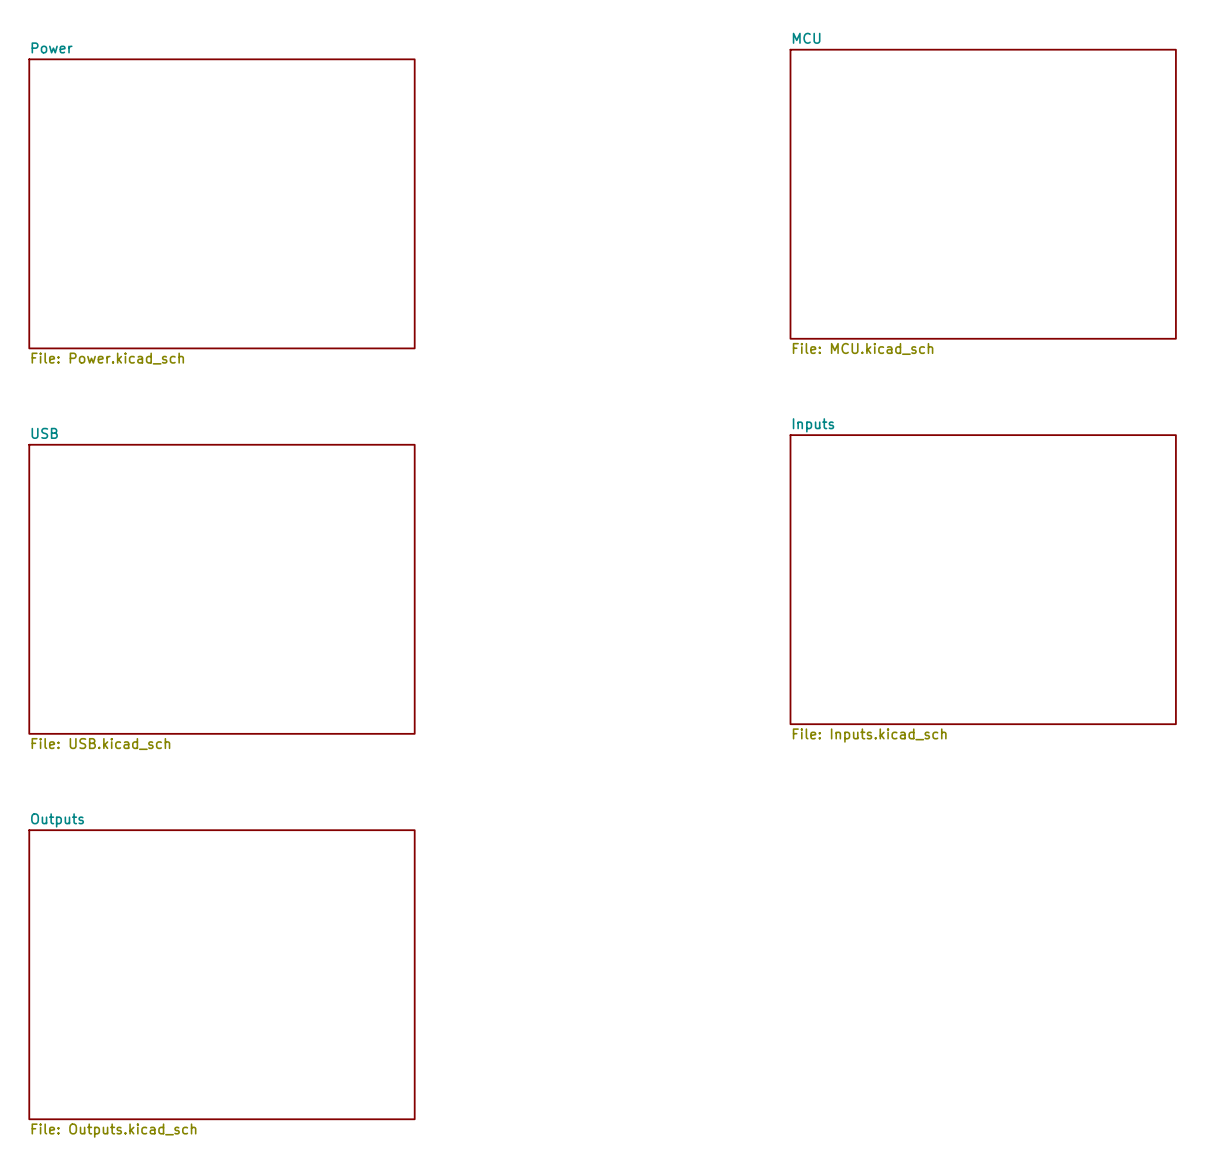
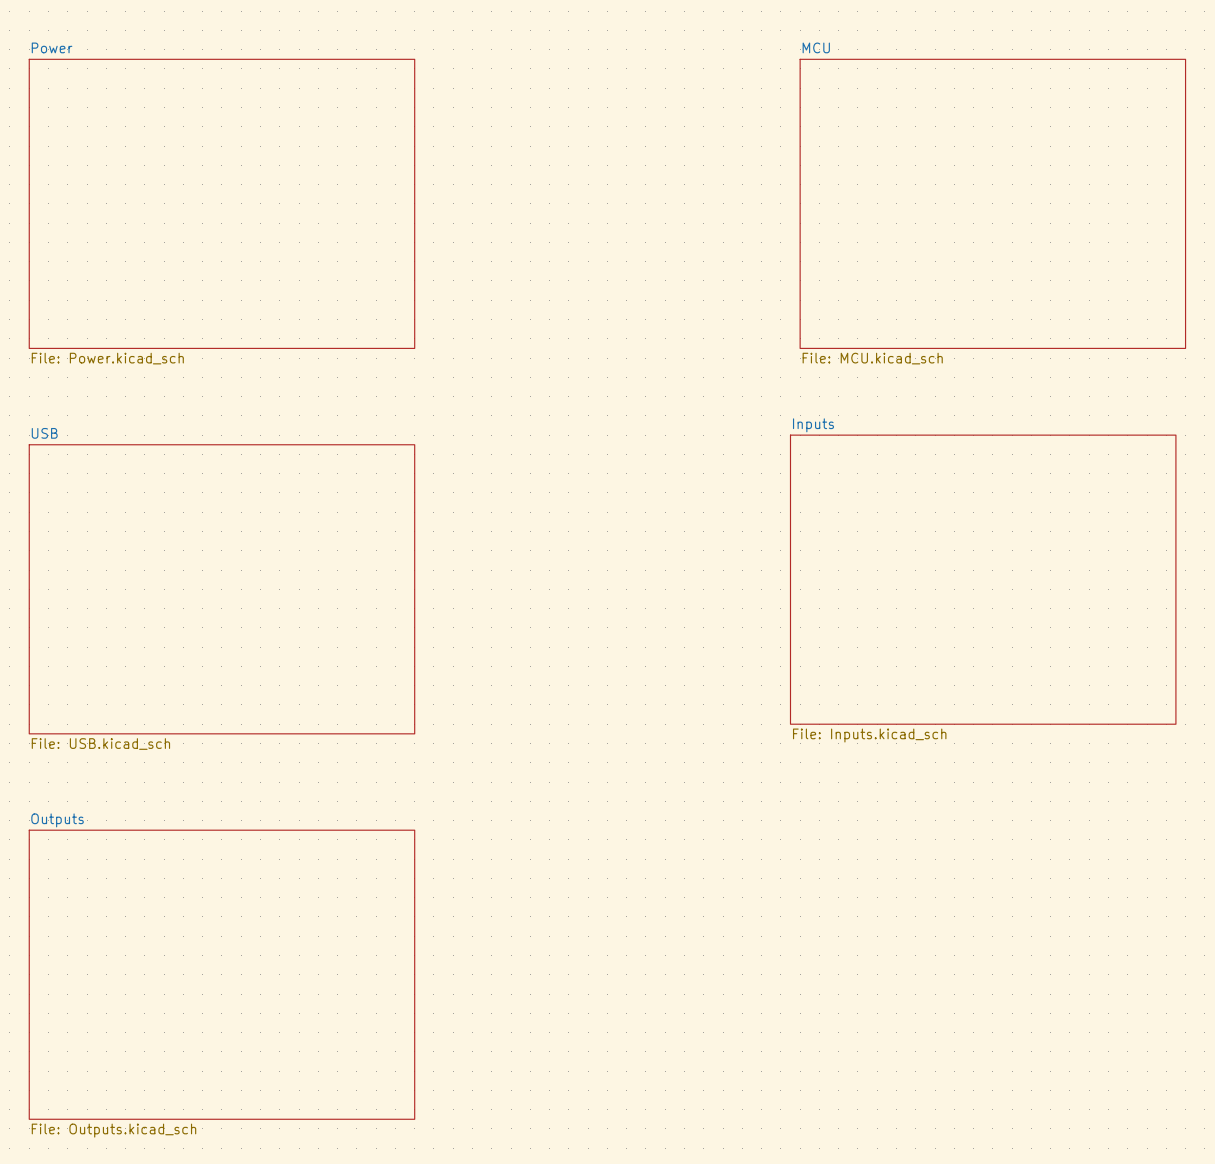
sheet MCU position: (983, 194) -> (992, 203)

